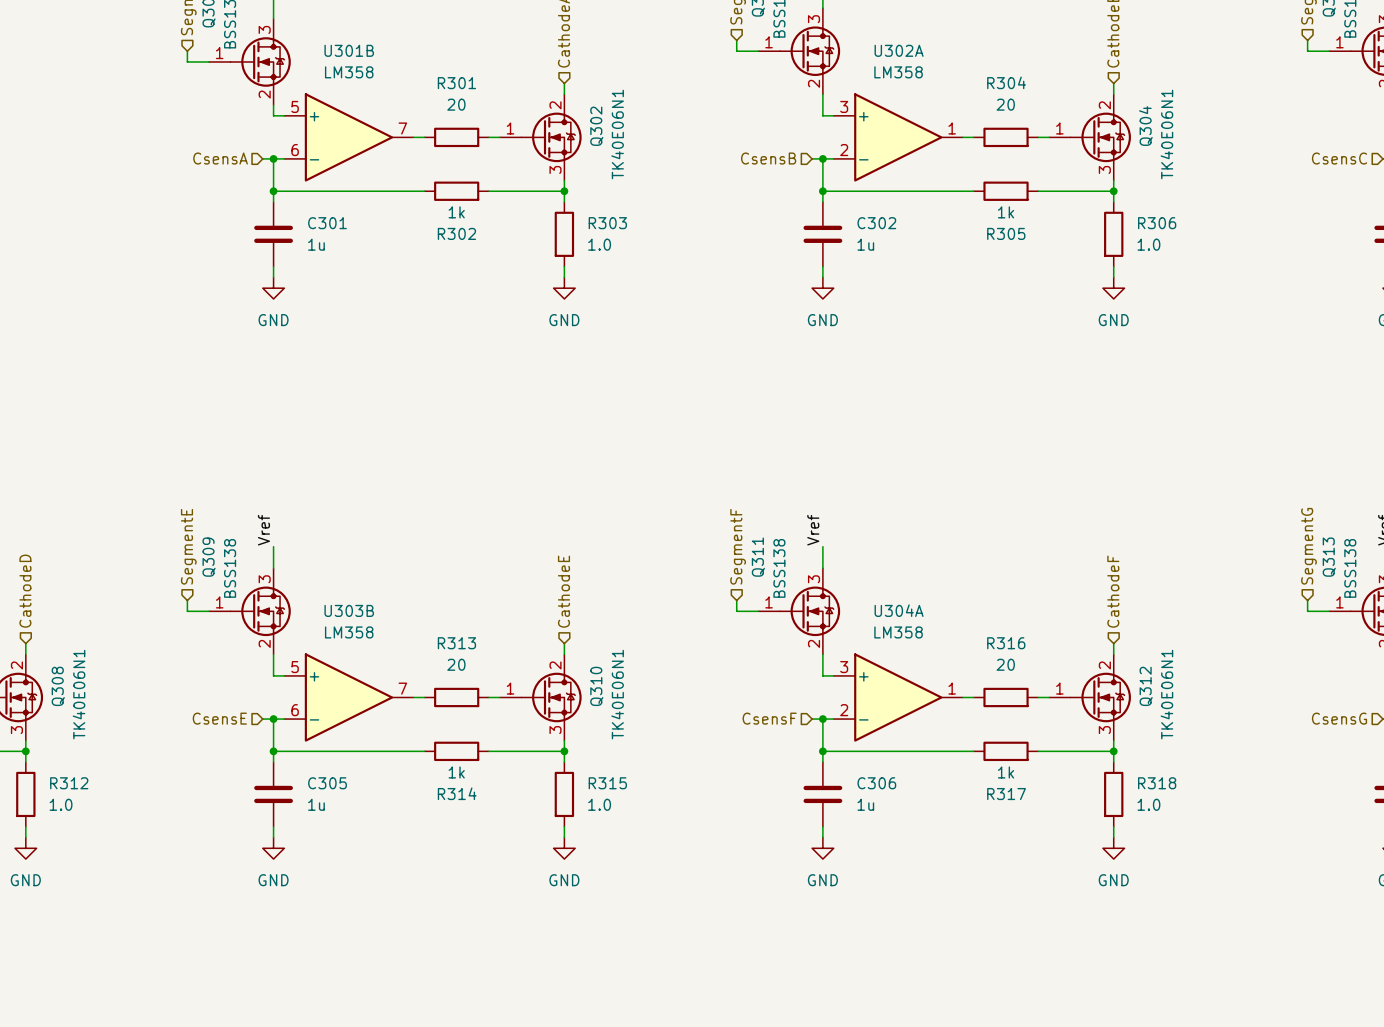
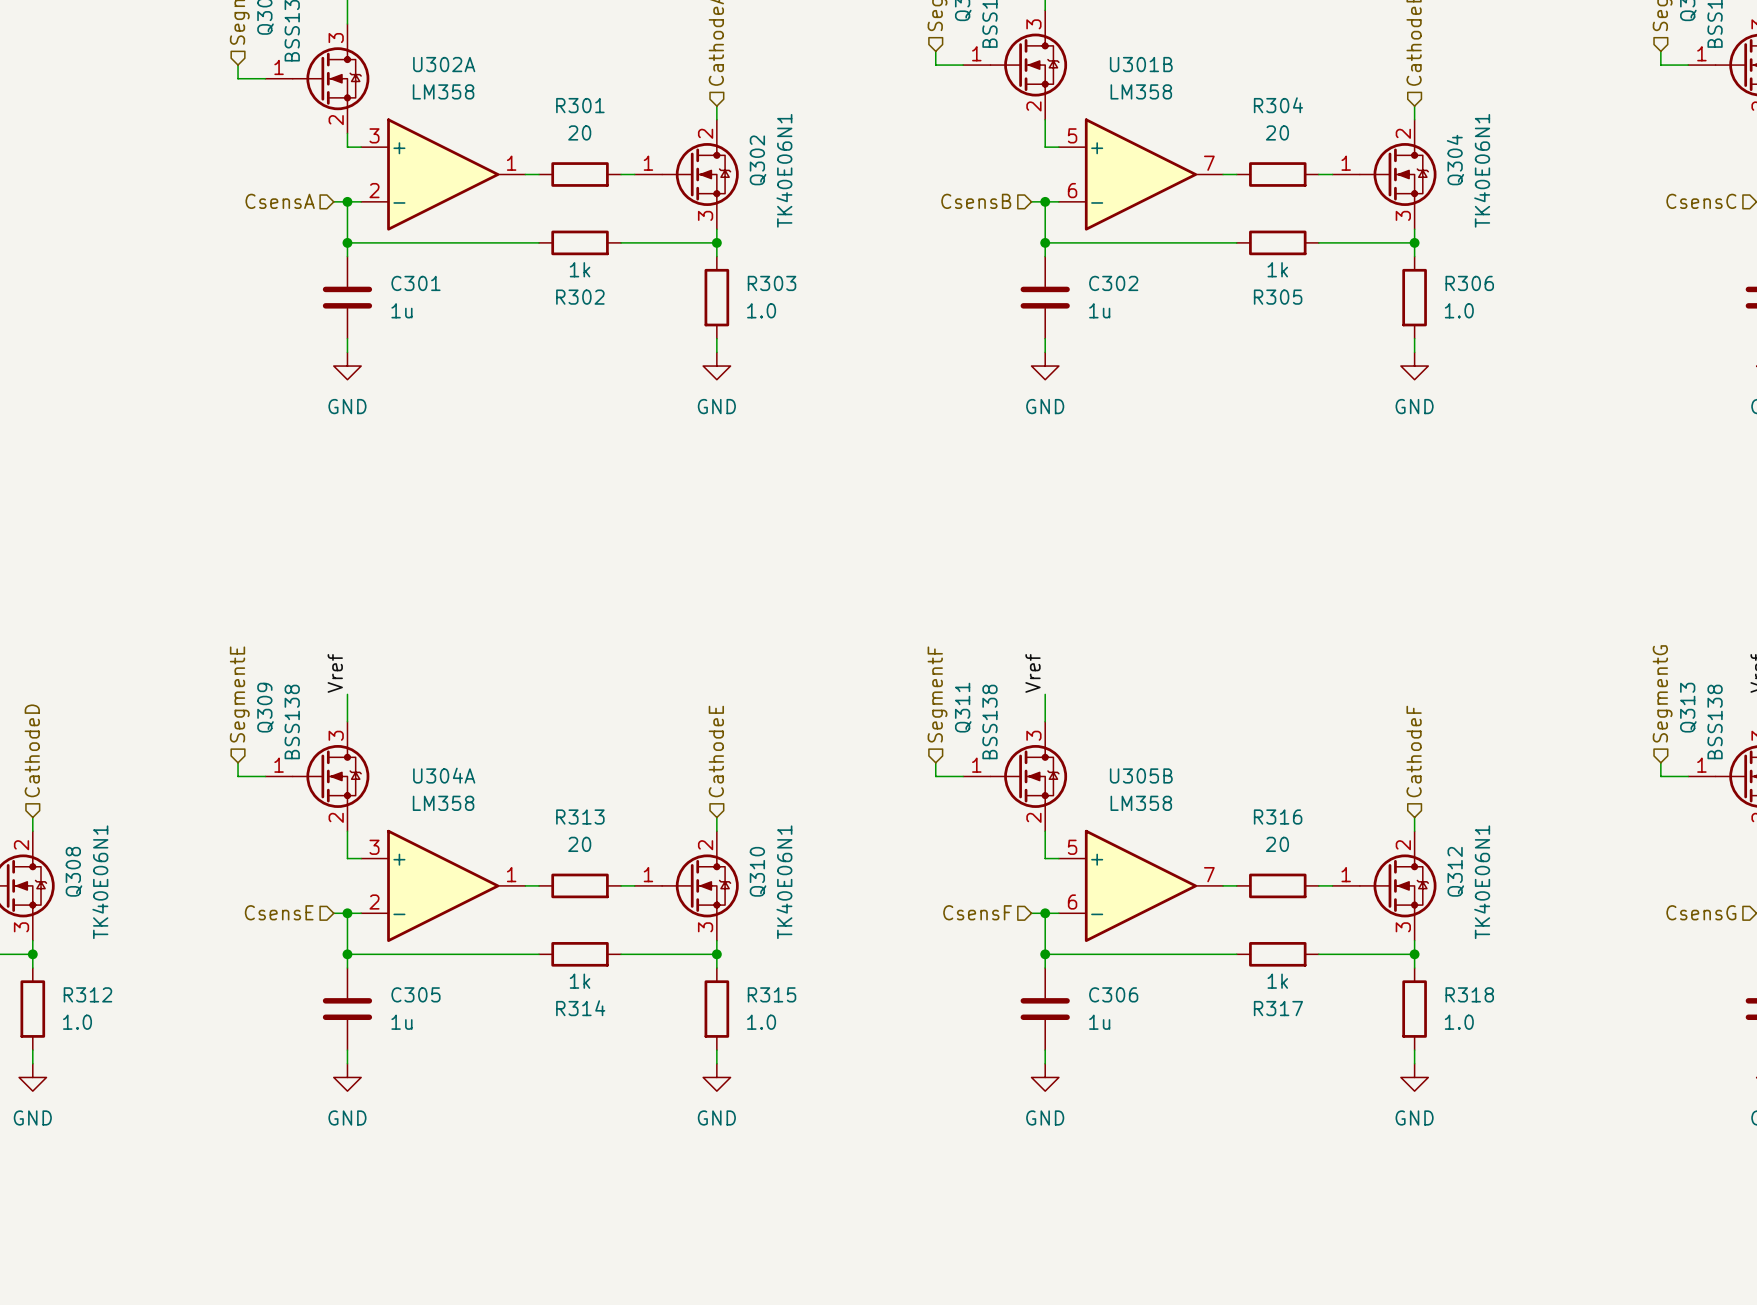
U301B position: (348, 137) -> (1140, 174)
U302A position: (898, 137) -> (443, 174)
U303B: LM358 (348, 697) -> none
U304A position: (898, 697) -> (443, 885)
U305B: none -> LM358 (1140, 885)

